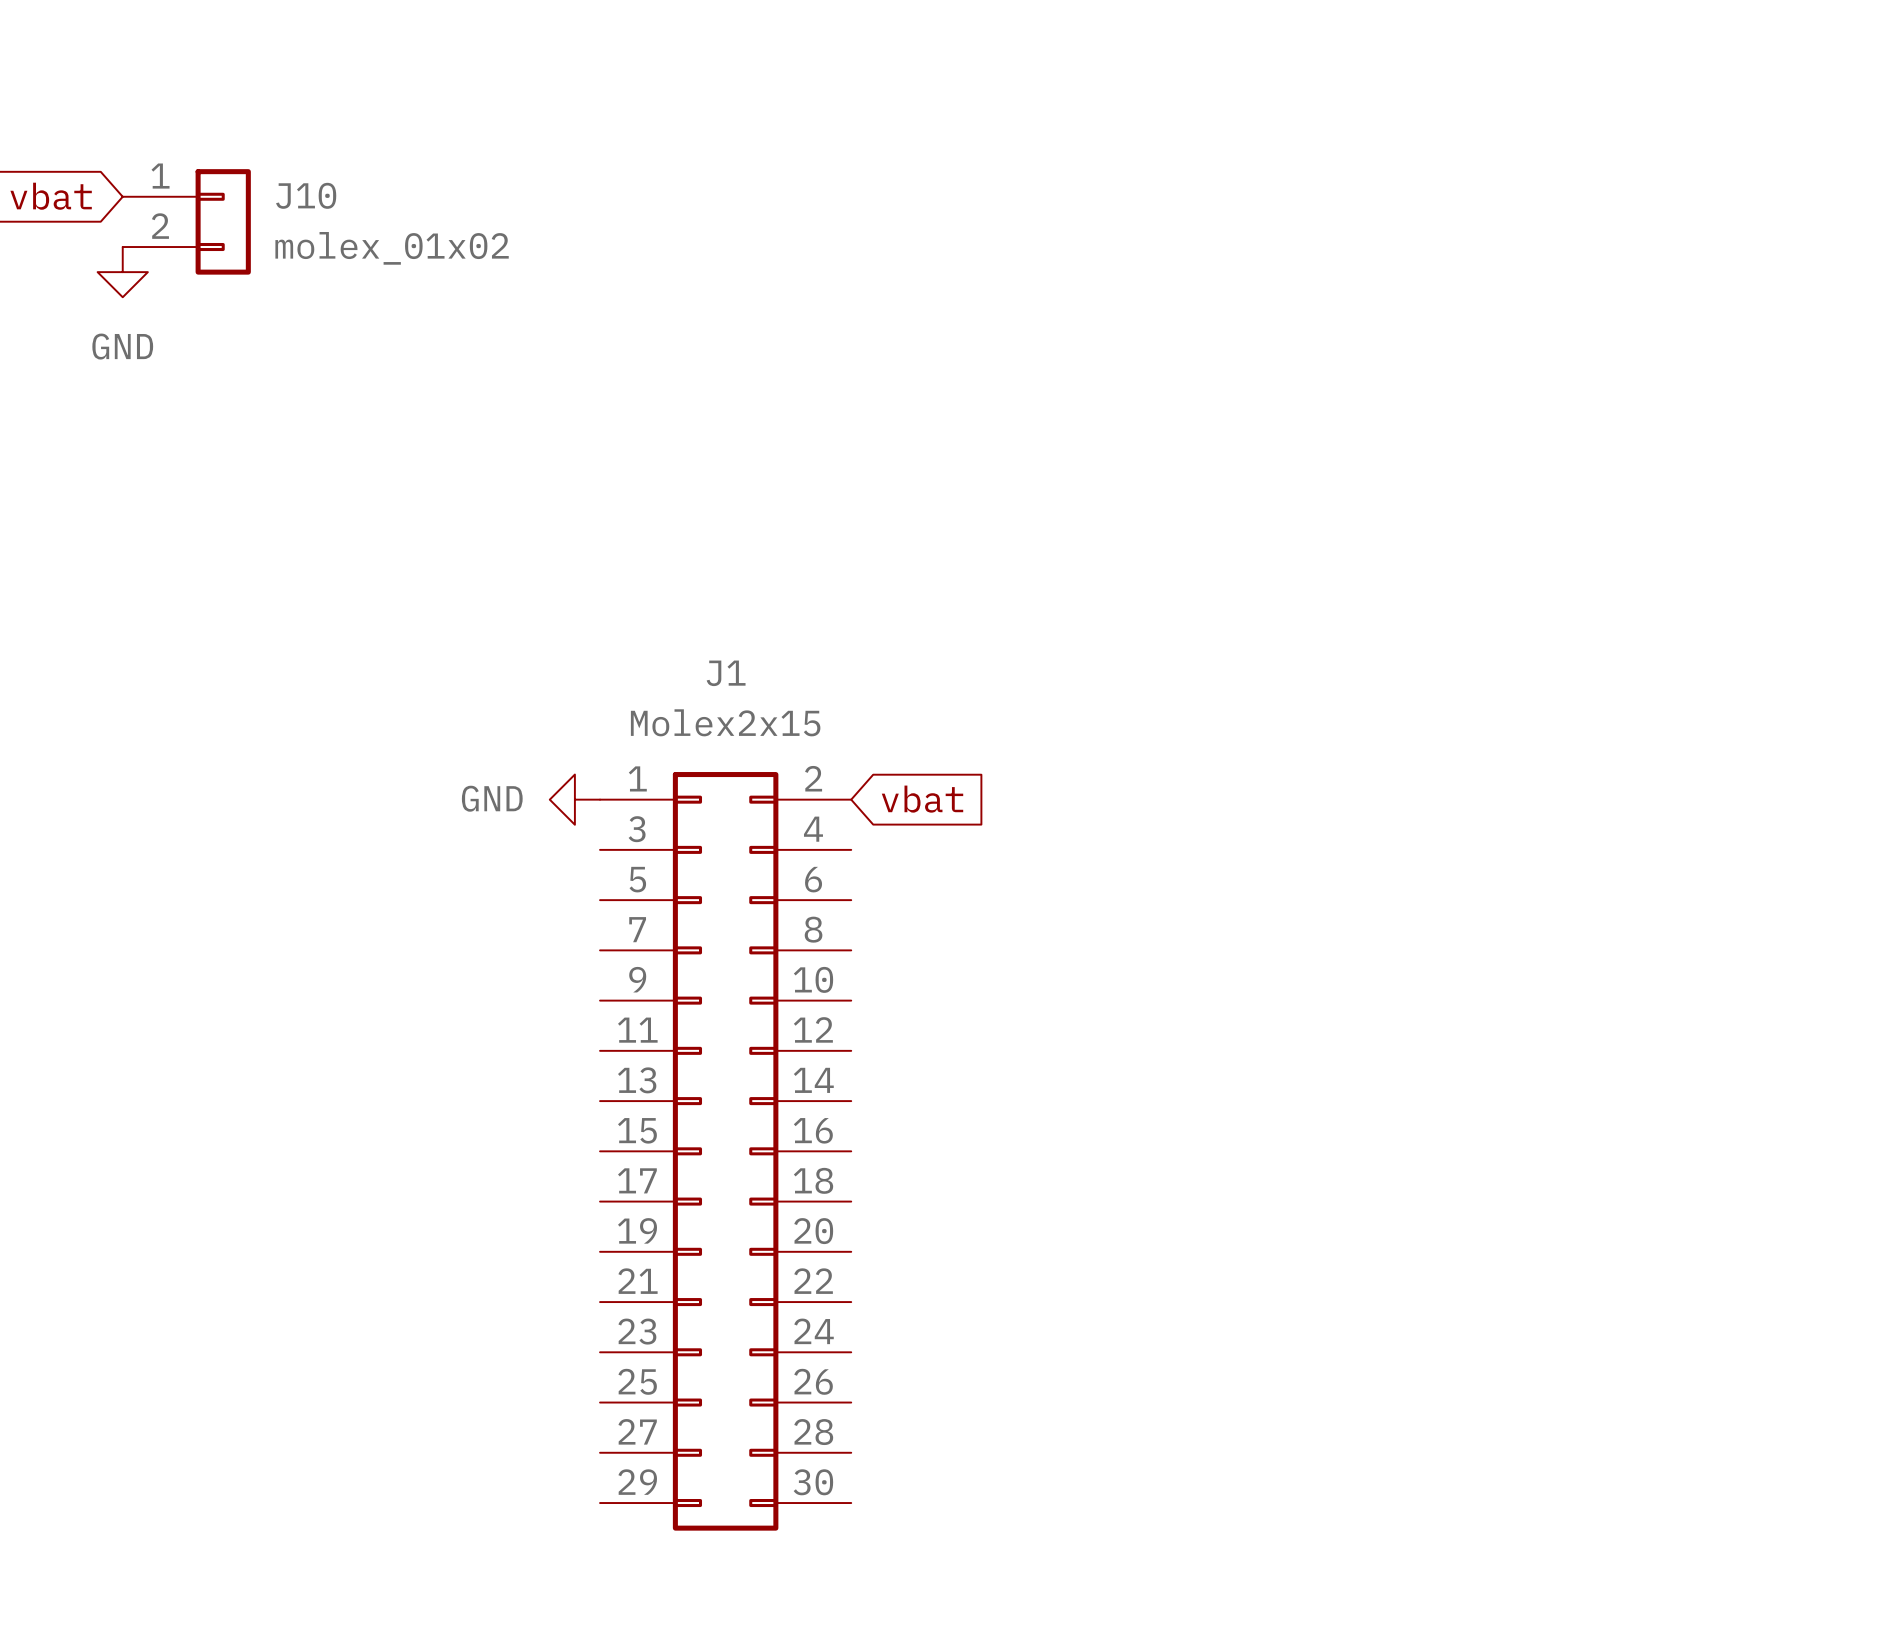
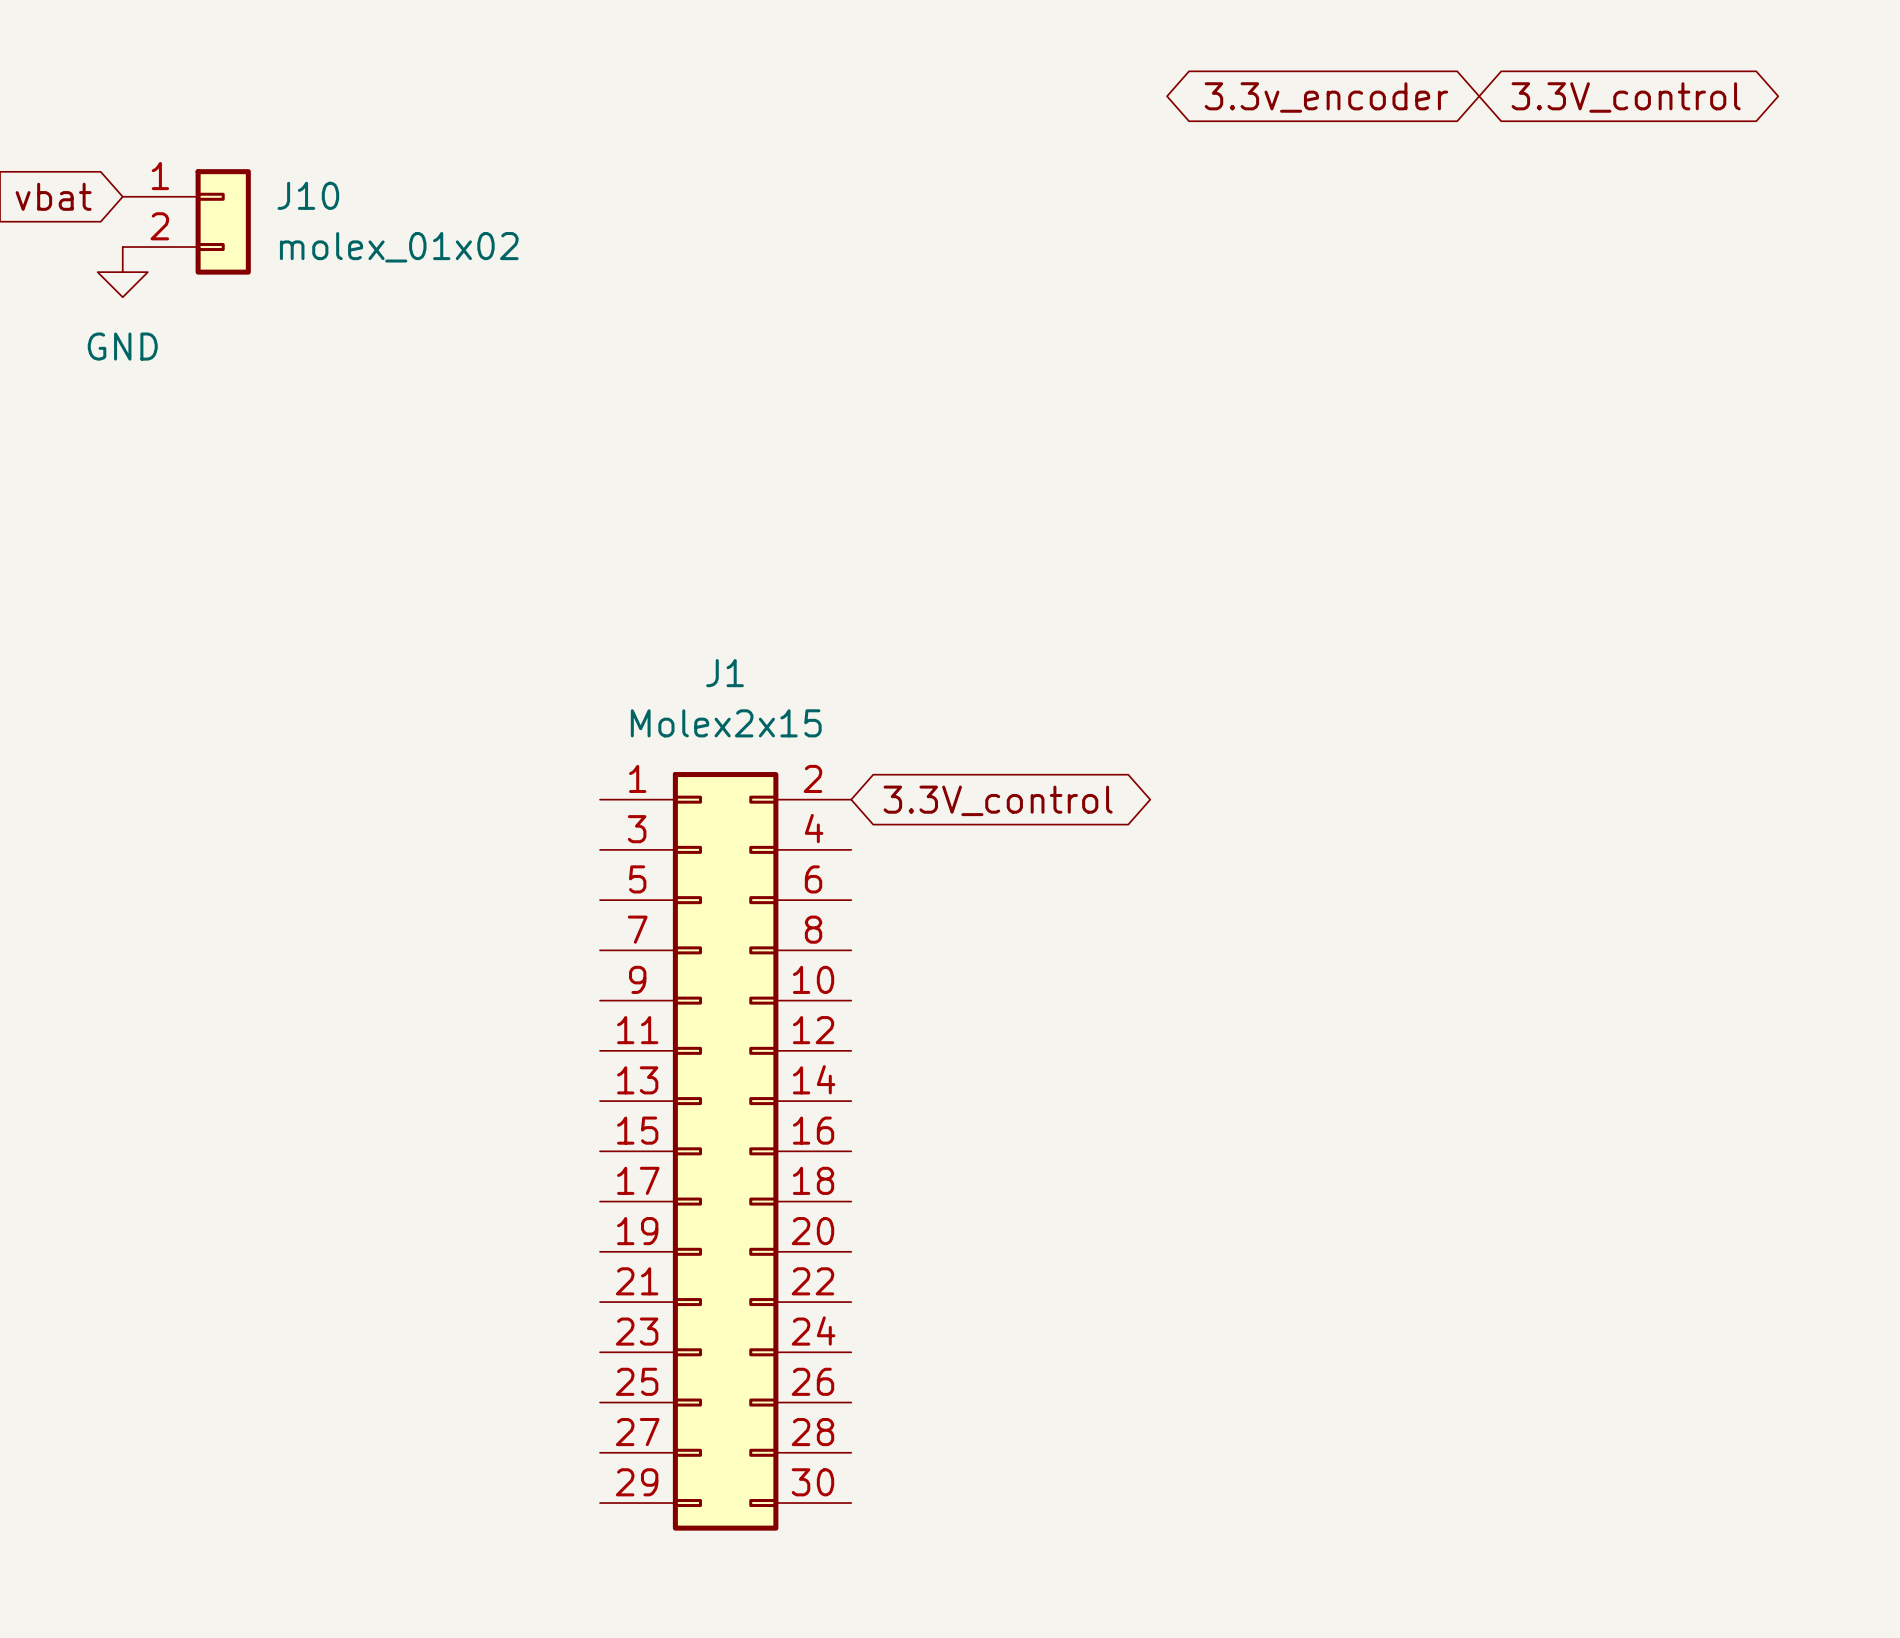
global label: none -> 3.3v_encoder (1326, 97)
global label: none -> 3.3V_control (1626, 97)
power symbol: GND (574, 799) -> none
global label shape: input (922, 799) -> bidirectional (998, 800)
global label: vbat (922, 799) -> 3.3V_control (998, 800)

